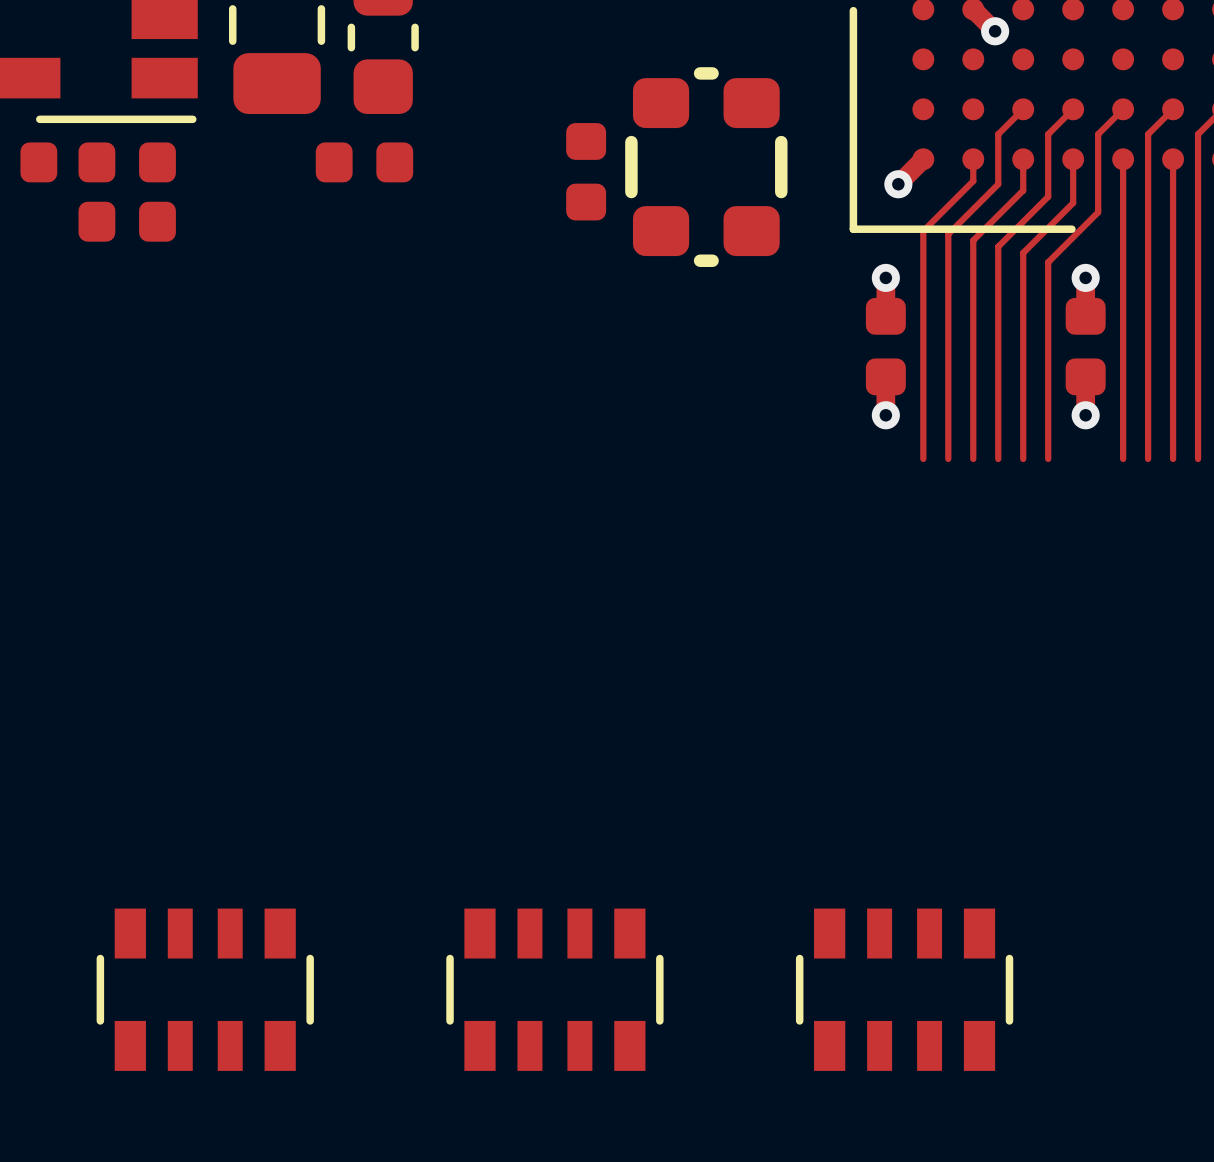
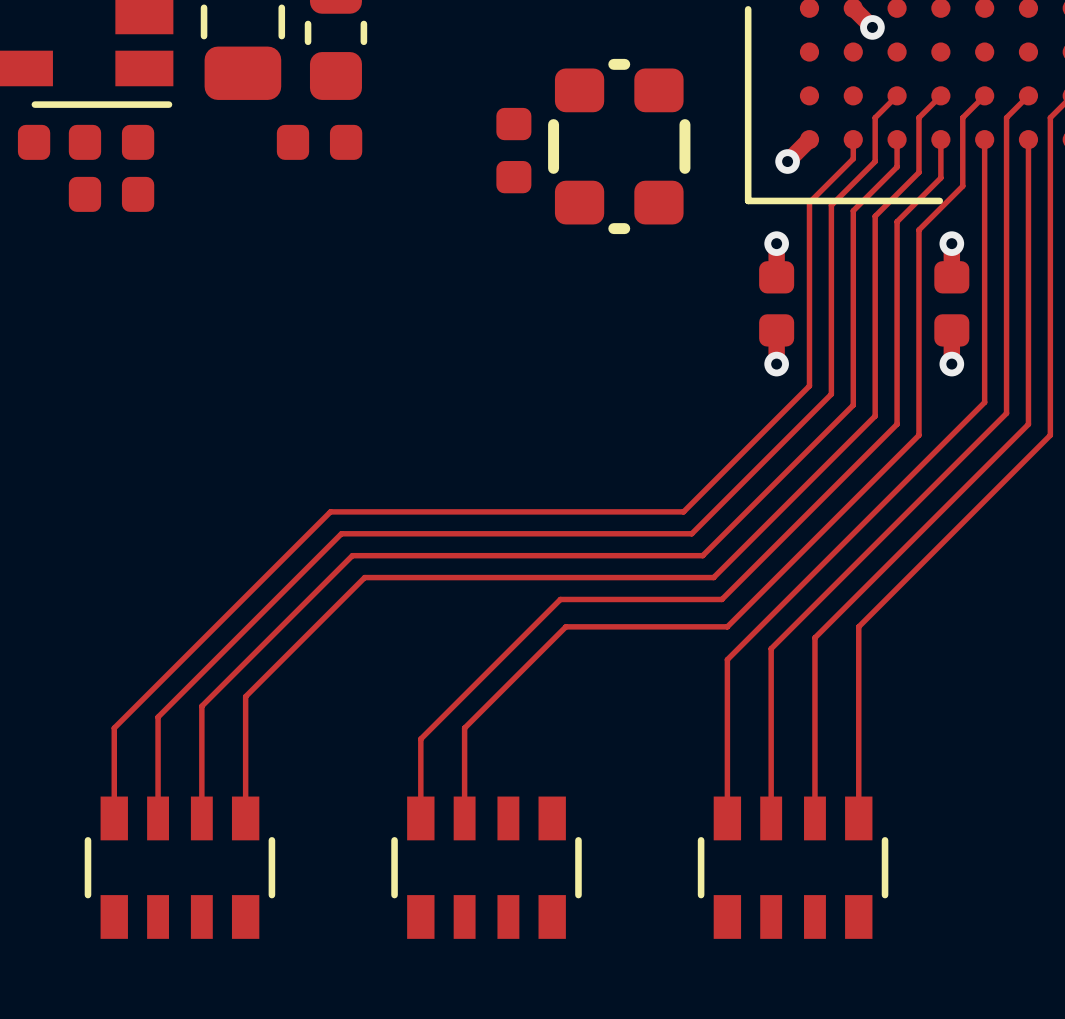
track: (923, 440) (923, 458) -> (809, 385) (683, 511) (330, 511) (114, 728) (114, 818)
track: (948, 449) (948, 458) -> (831, 394) (691, 533) (341, 533) (158, 717) (158, 818)
track: none -> (853, 402) (853, 405) (702, 555) (352, 555) (201, 706) (201, 818)
track: none -> (875, 402) (875, 416) (713, 577) (364, 577) (245, 696) (245, 818)
track: none -> (897, 402) (897, 424) (721, 599) (560, 599) (420, 739) (420, 818)
track: none -> (918, 402) (918, 435) (727, 626) (565, 626) (464, 728) (464, 818)
track: none -> (984, 402) (727, 659) (727, 818)
track: none -> (1006, 402) (1006, 413) (771, 648) (771, 818)
track: none -> (1028, 402) (1028, 424) (814, 637) (814, 818)
track: none -> (1050, 402) (1050, 435) (858, 626) (858, 818)

